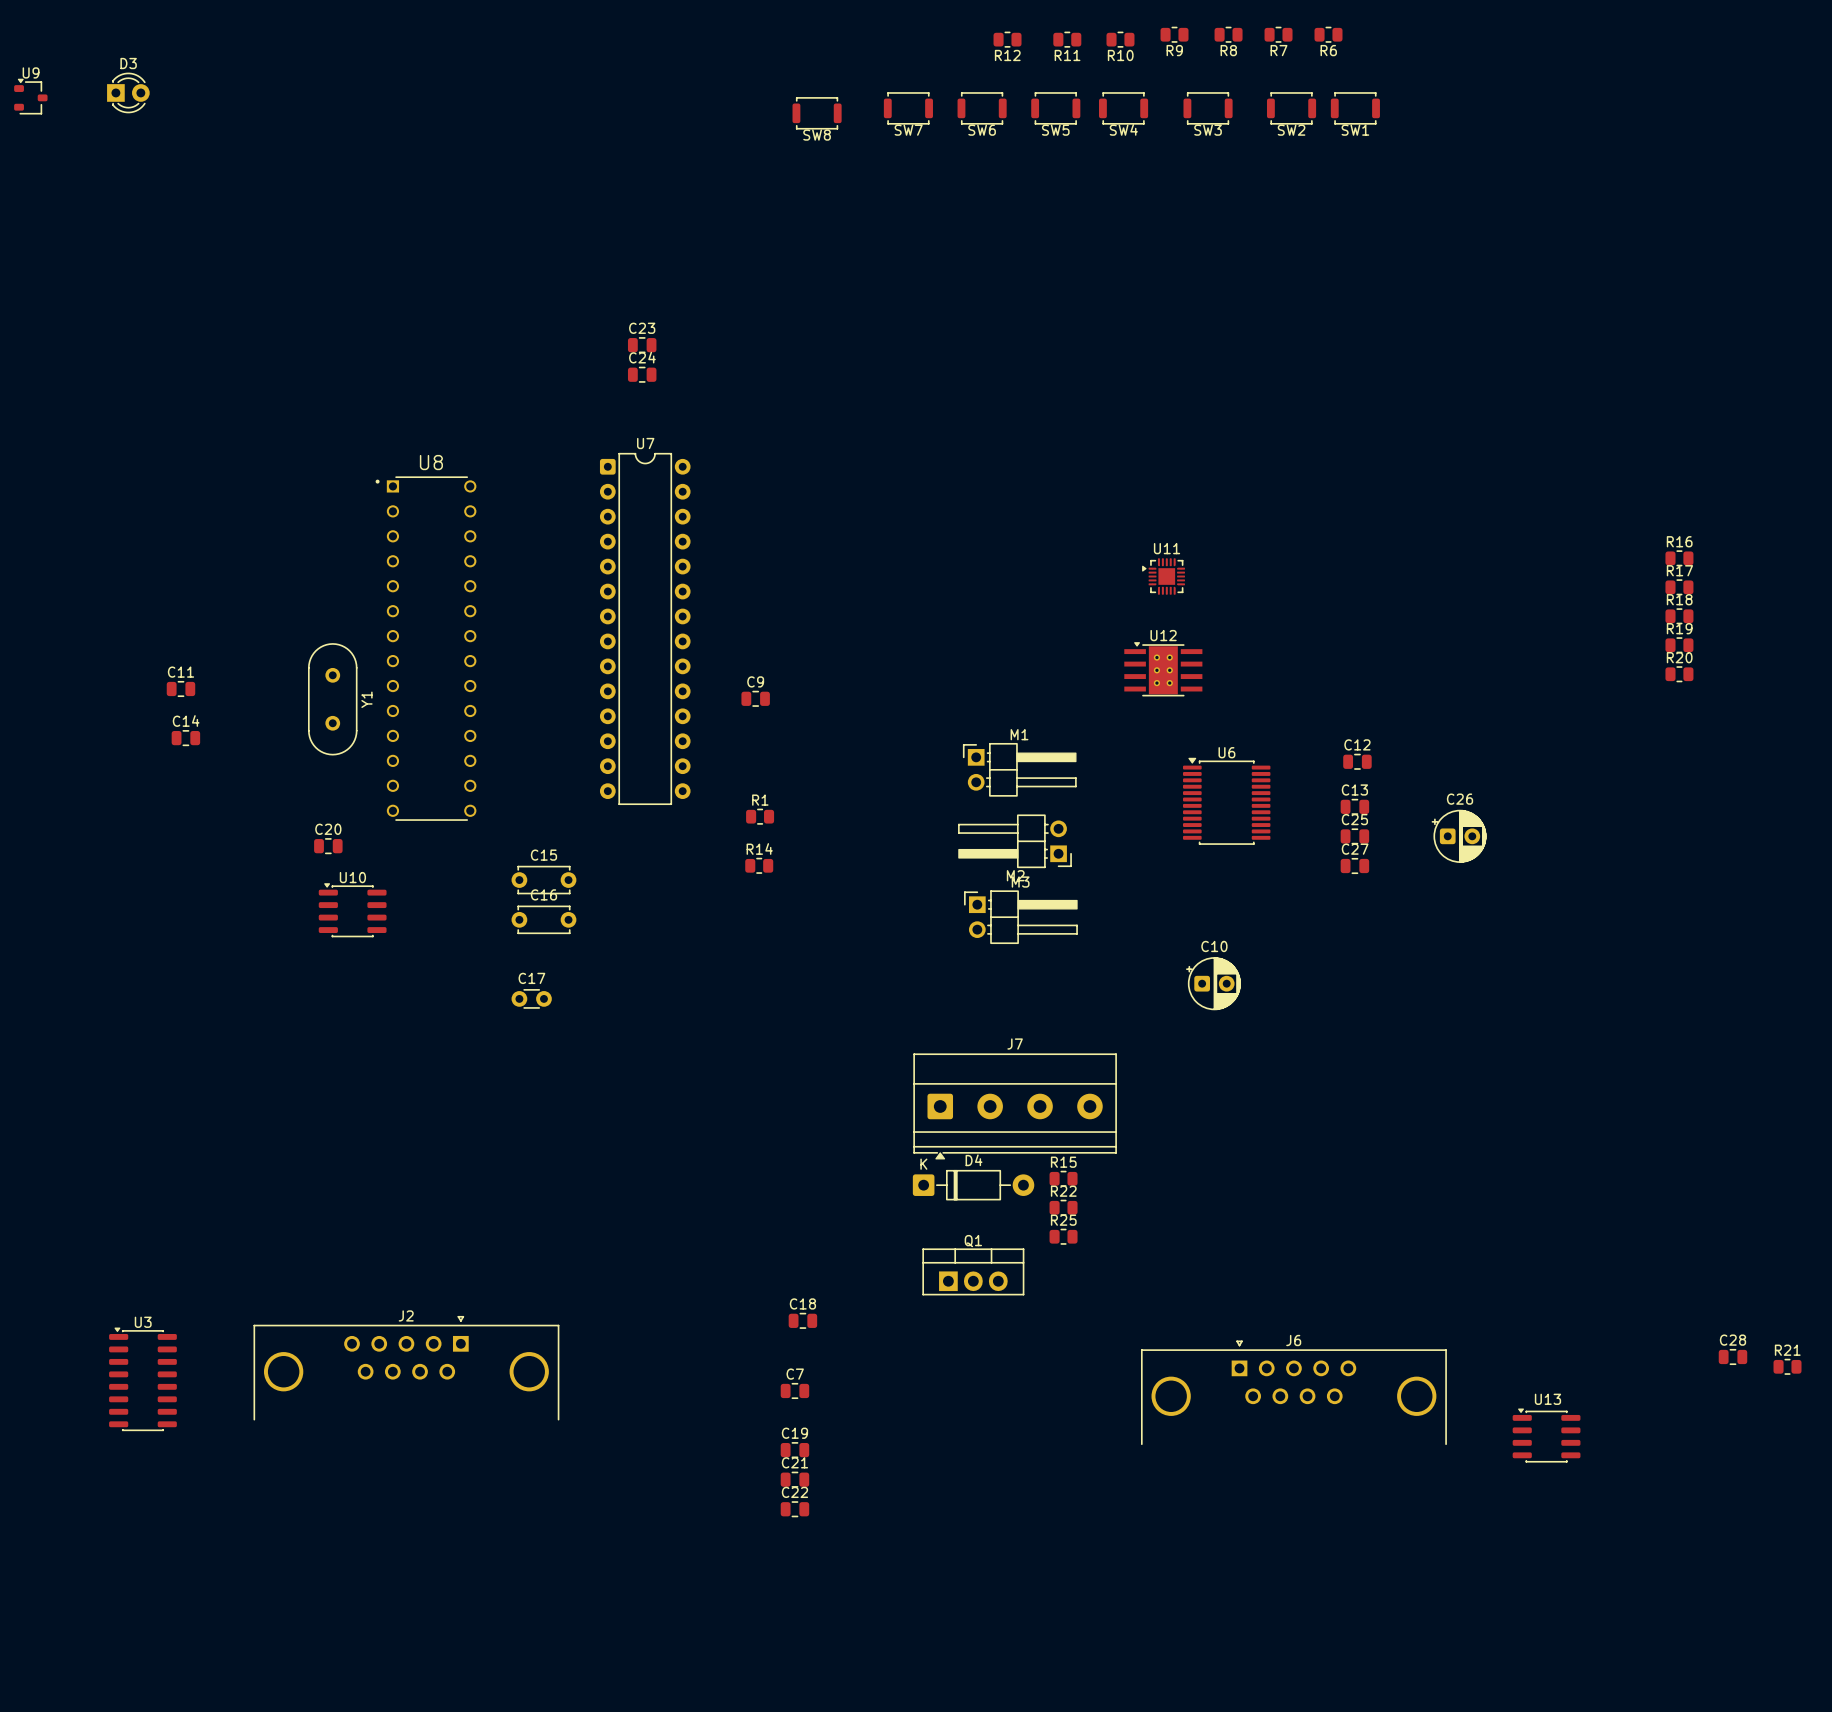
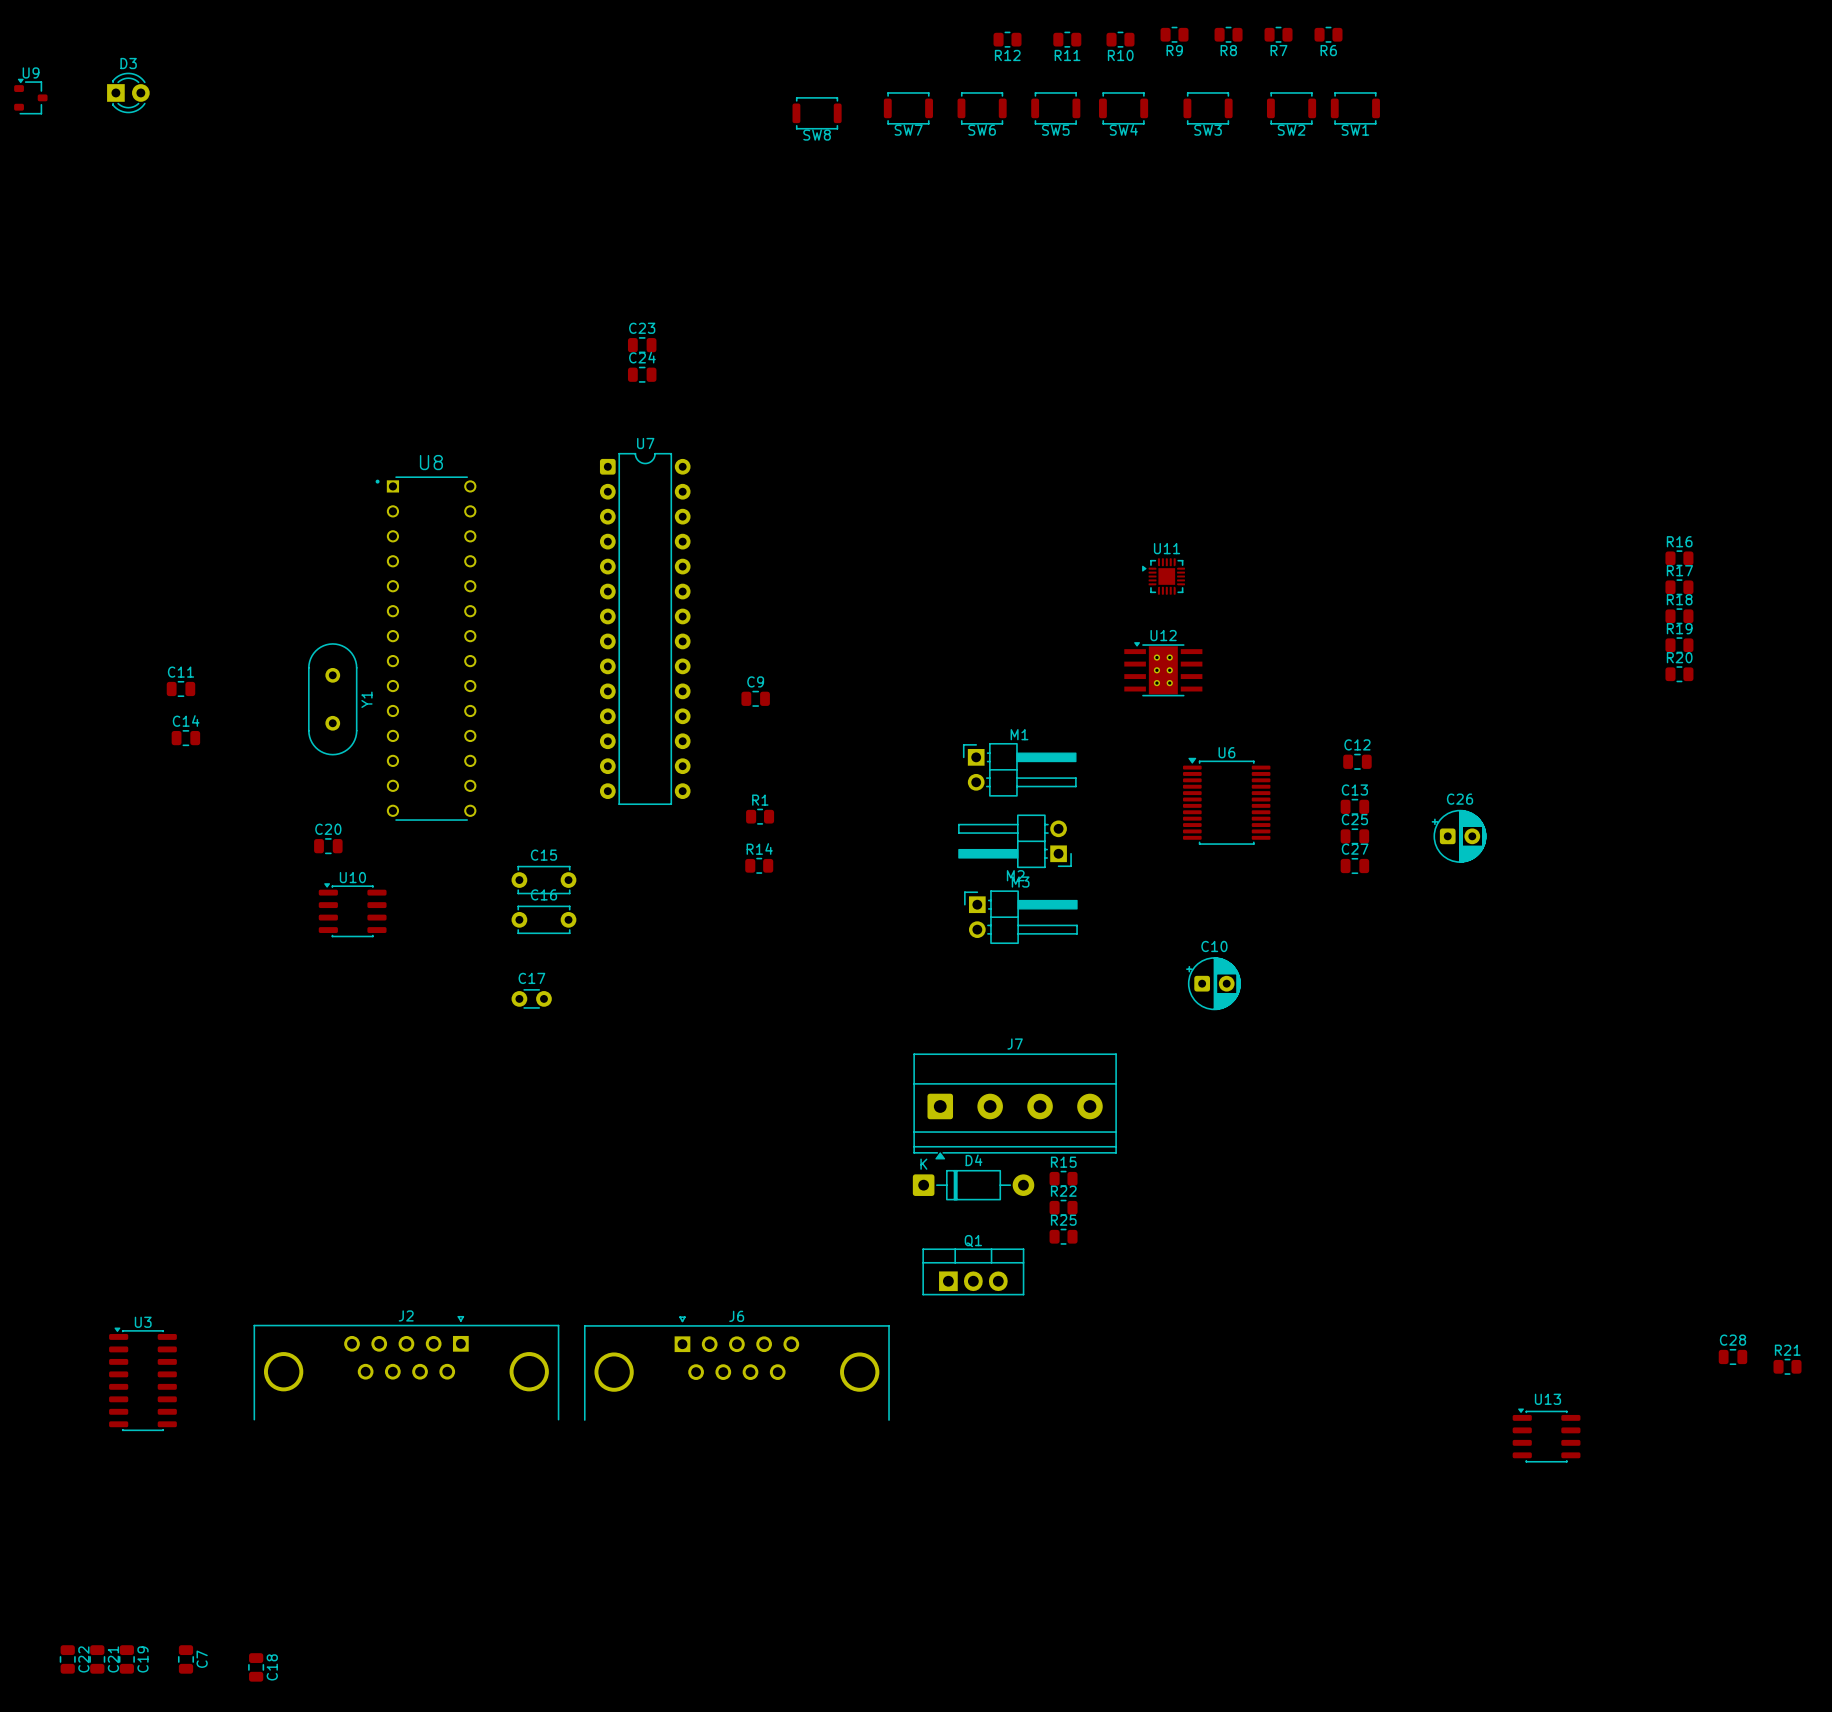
C18 rotation: 0° (802, 1320) -> 90° clockwise (256, 1667)
C18 position: (802, 1320) -> (256, 1667)
C7 rotation: 0° (794, 1390) -> 90° clockwise (186, 1659)
C7 position: (794, 1390) -> (186, 1659)
J6 position: (1293, 1392) -> (736, 1368)
C19 rotation: 0° (794, 1450) -> 90° clockwise (126, 1659)
C19 position: (794, 1450) -> (126, 1659)
C21 rotation: 0° (794, 1479) -> 90° clockwise (97, 1659)
C21 position: (794, 1479) -> (97, 1659)
C22 rotation: 0° (794, 1509) -> 90° clockwise (67, 1659)
C22 position: (794, 1509) -> (67, 1659)

